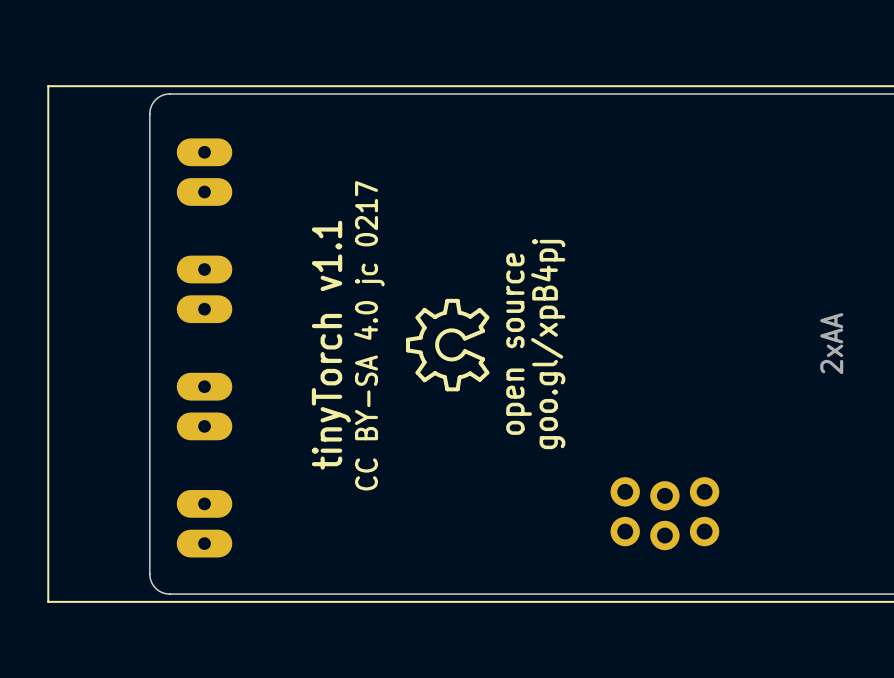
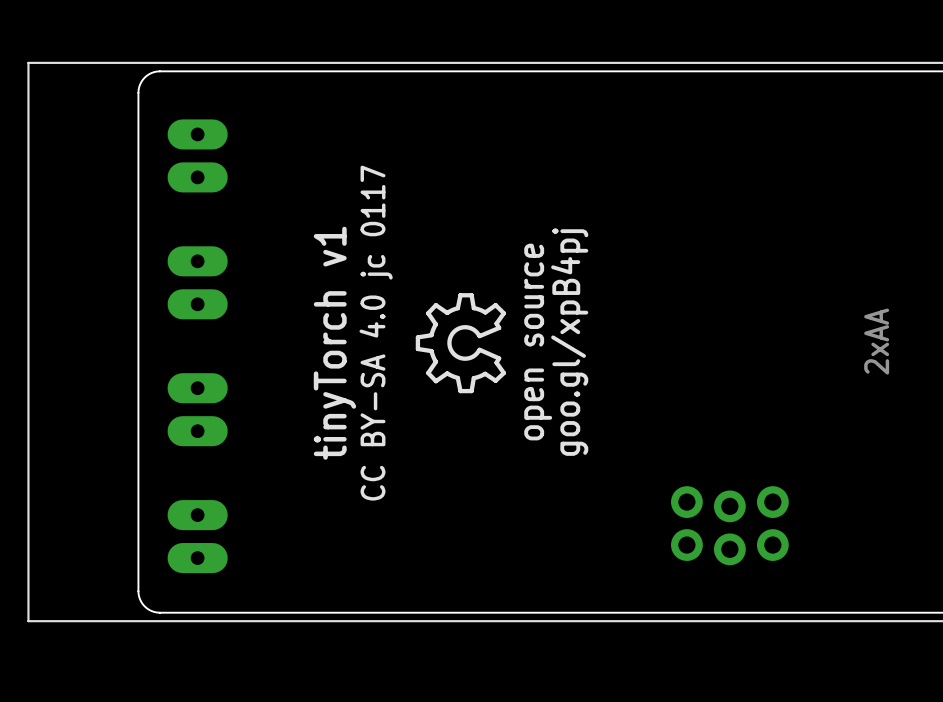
text: CC BY-SA 4.0 jc 0217 (369, 335) -> CC BY-SA 4.0 jc 0117 (376, 333)
text: tinyTorch v1.1 (331, 345) -> tinyTorch v1 (334, 343)
part position: (664, 513) -> (729, 525)

